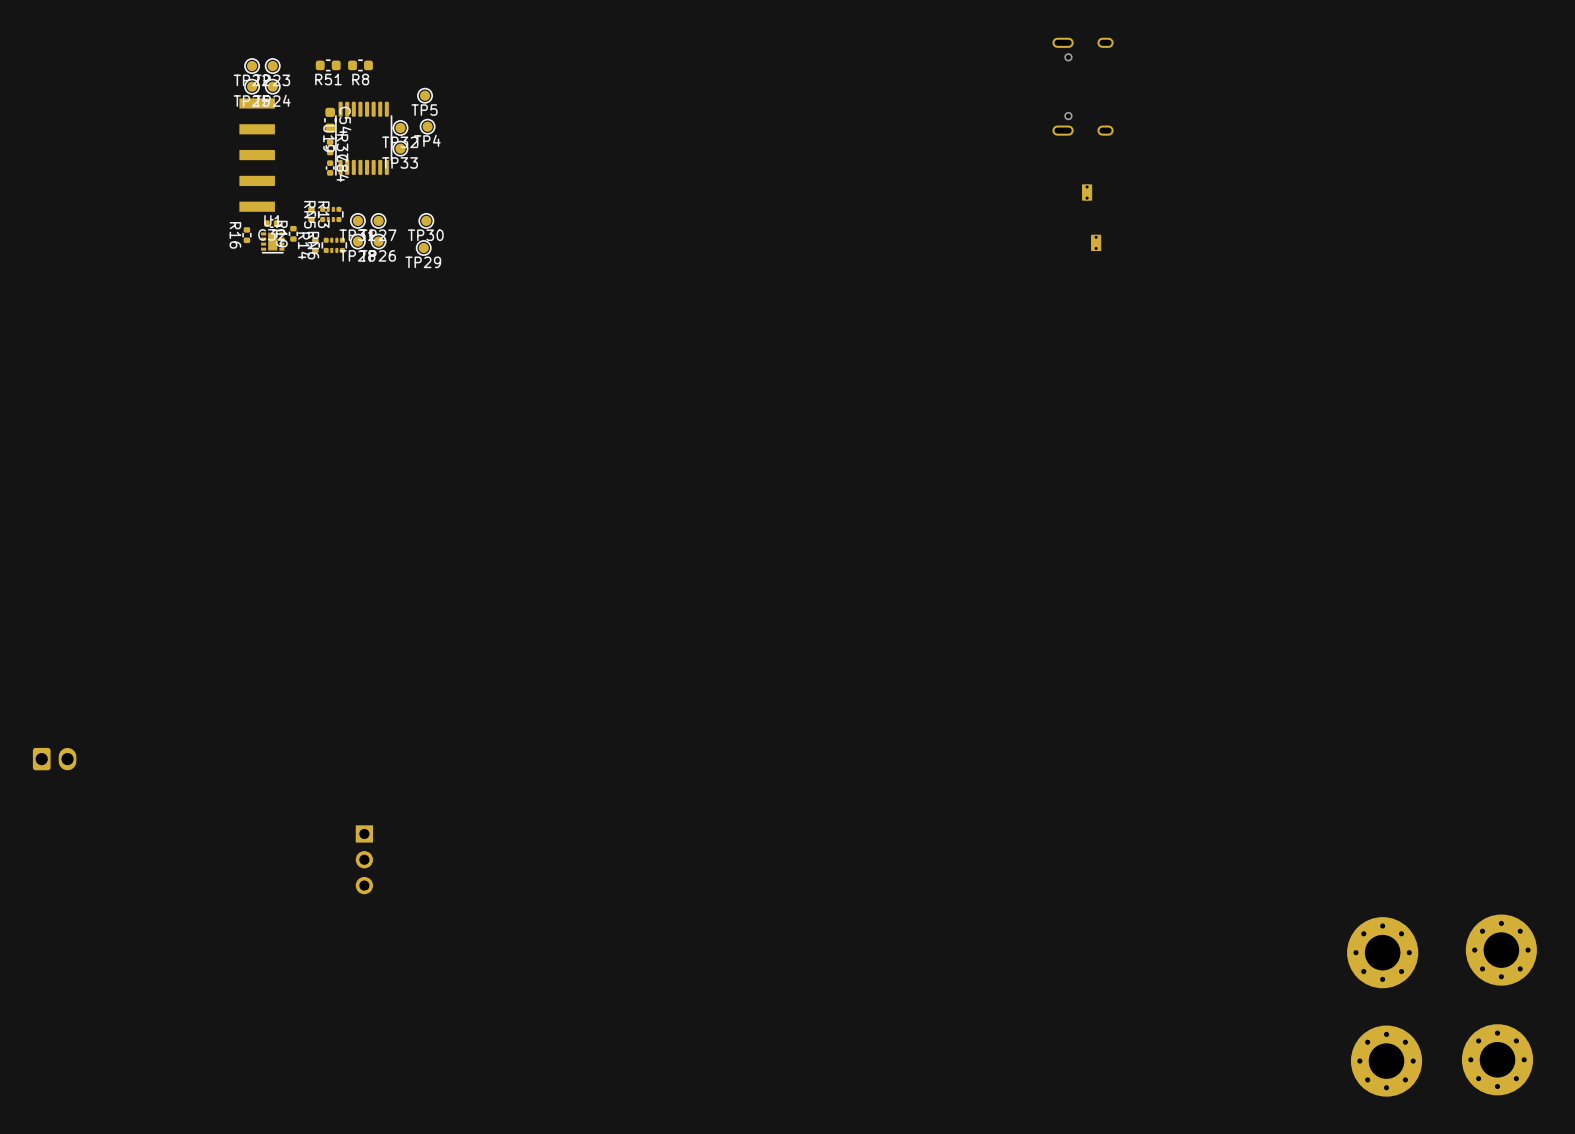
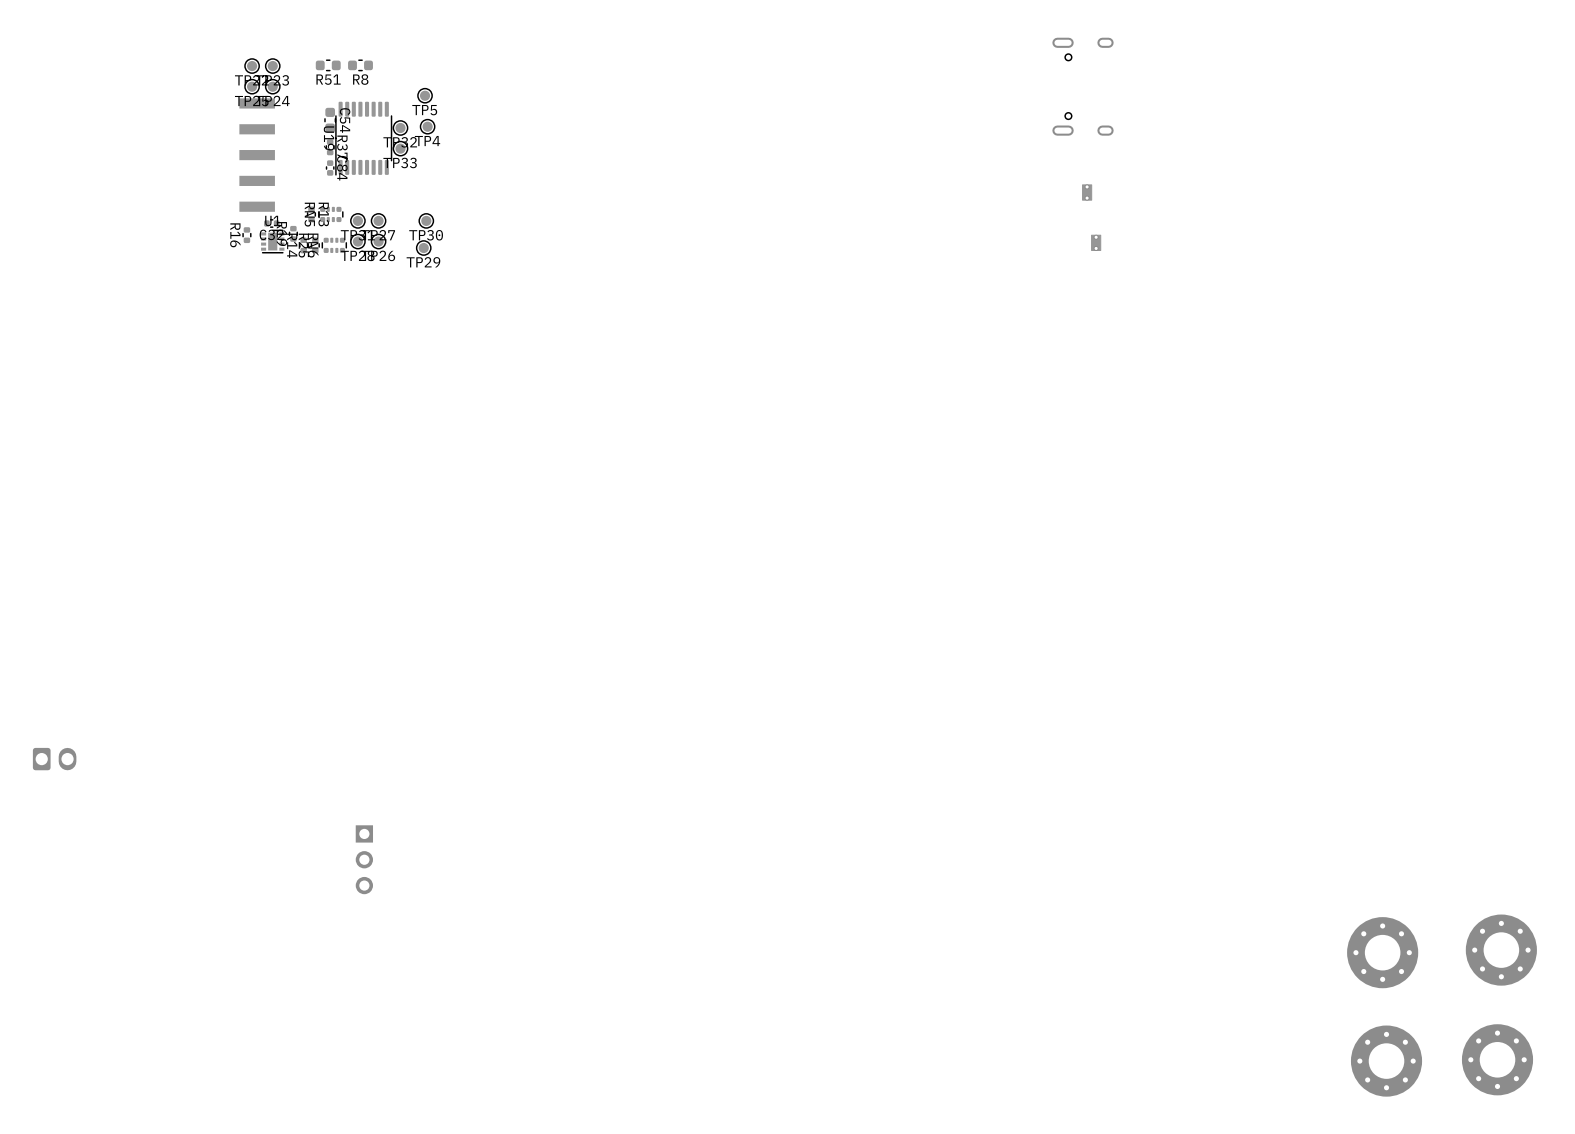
R14: none -> (303, 245)
R14 name: R14 (304, 245) -> R25 (303, 245)

